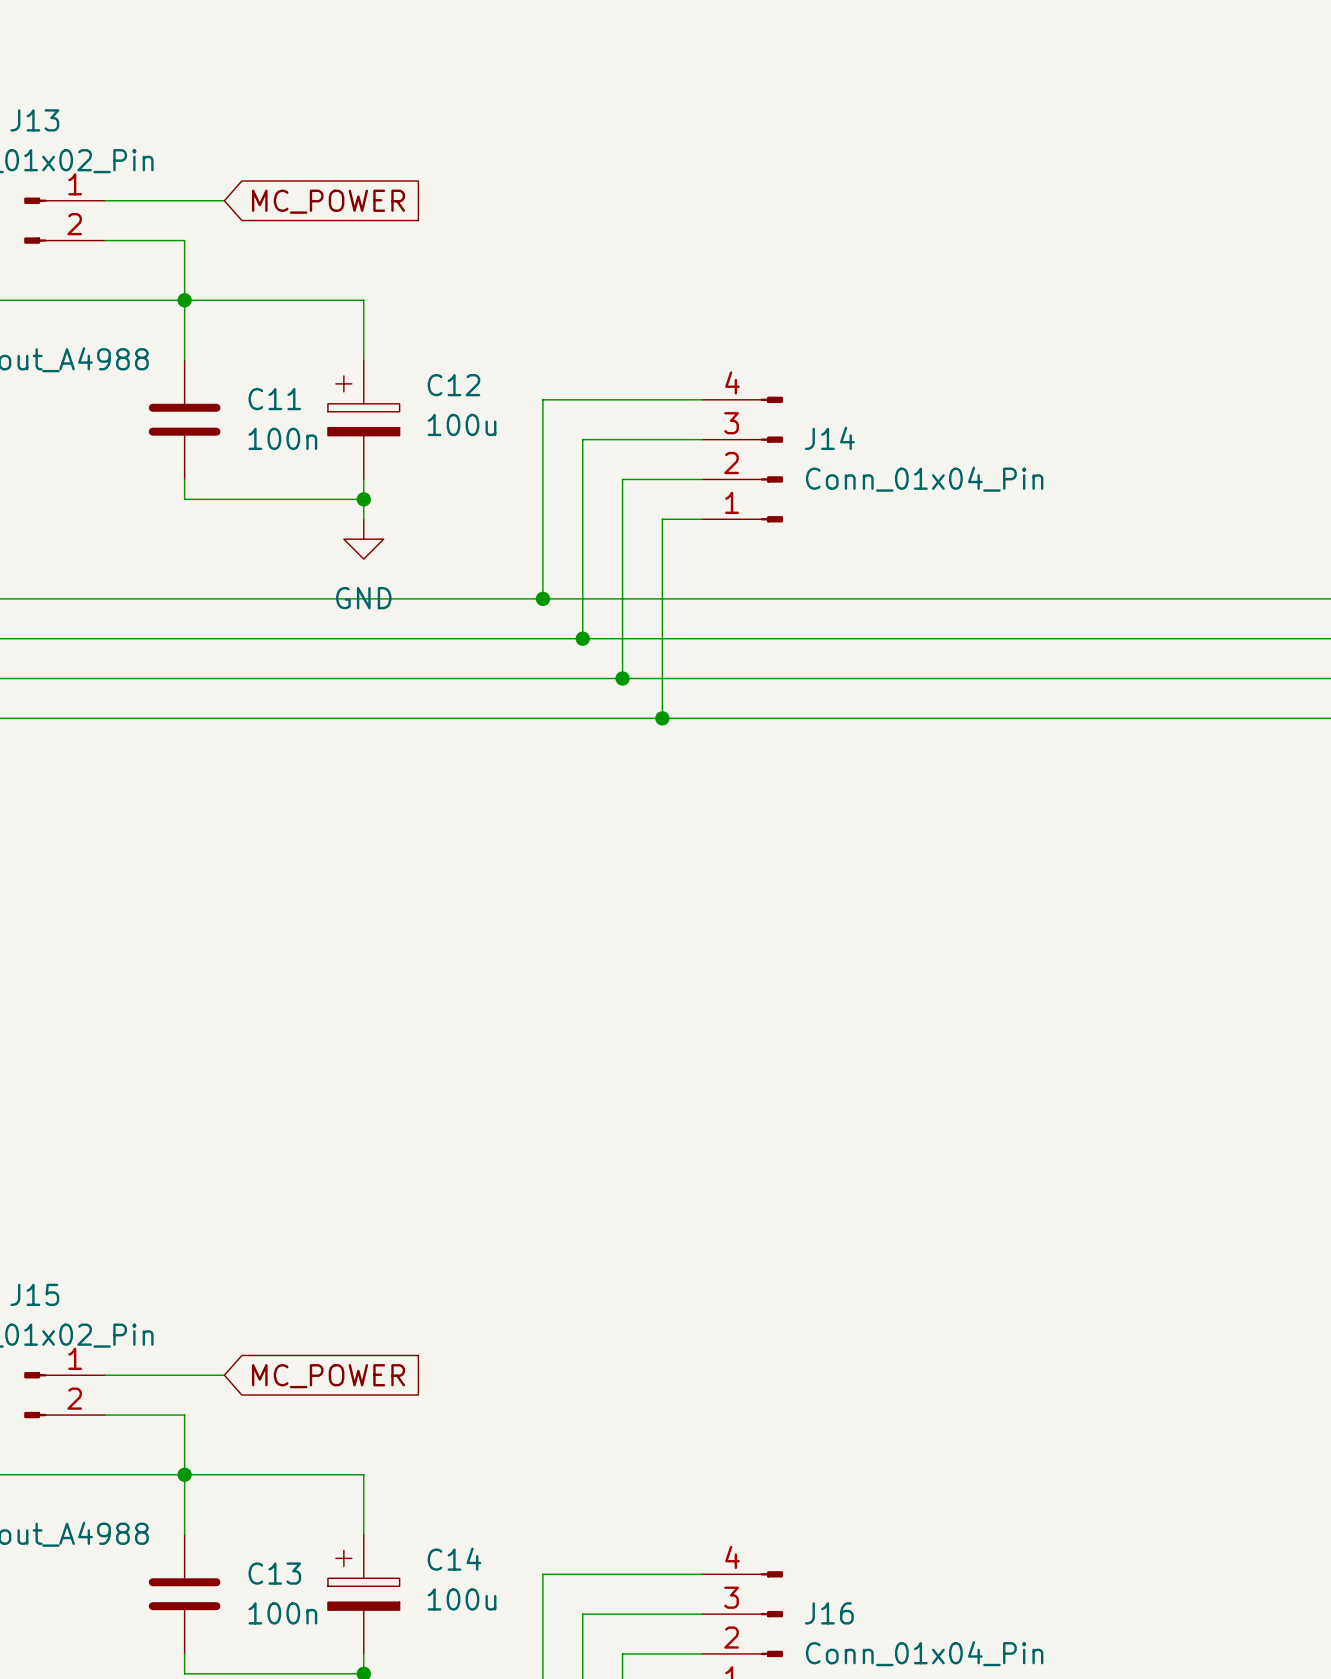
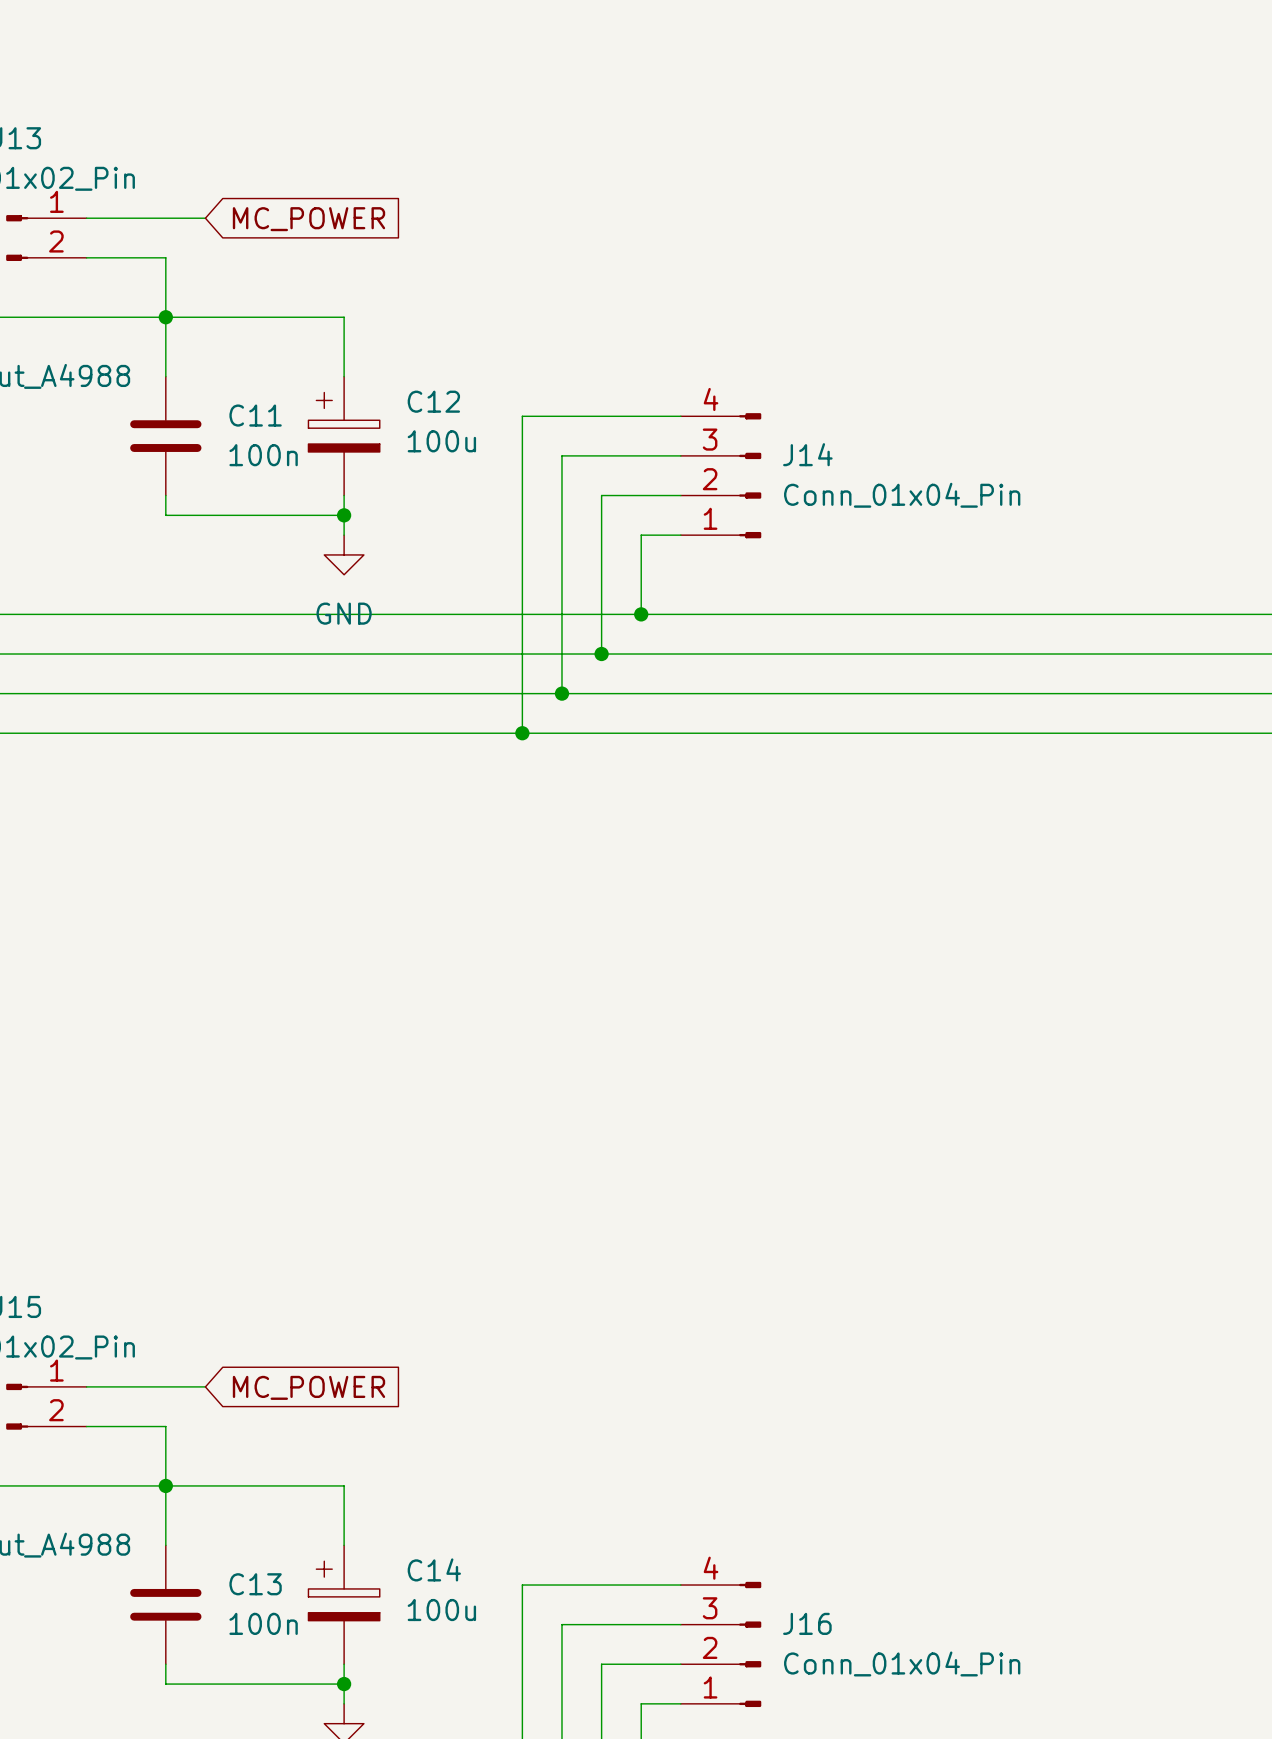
junction: (542, 598) -> none
wire: (662, 598) (662, 718) -> (522, 614) (522, 733)
junction: none -> (641, 614)
junction: (582, 638) -> none
wire: (622, 638) (622, 678) -> (561, 654) (561, 693)
junction: none -> (601, 654)
junction: none -> (561, 693)
junction: (622, 678) -> none
junction: none -> (522, 733)
junction: (662, 718) -> none

